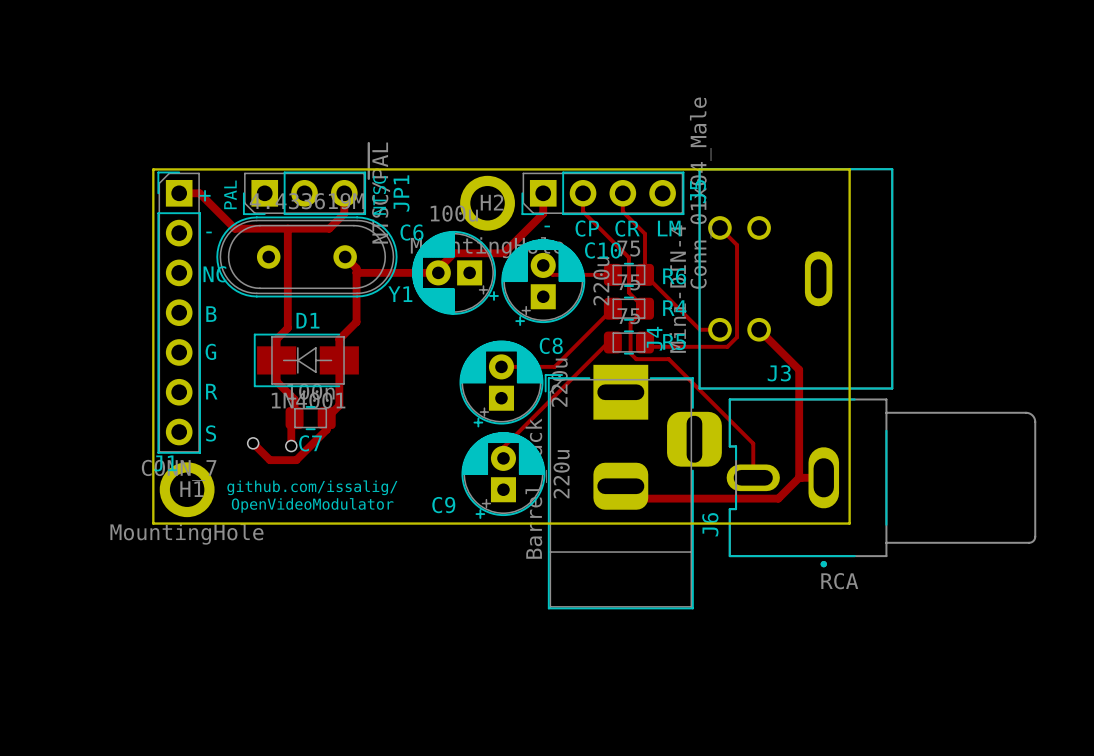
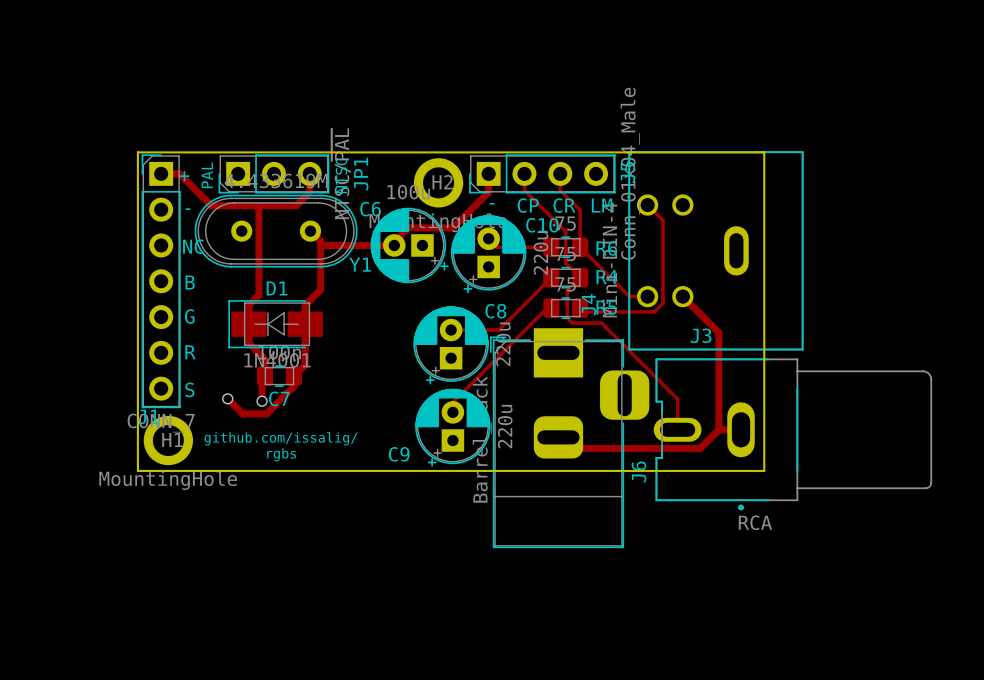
text: OpenVideoModulator (312, 505) -> rgbs (281, 454)

